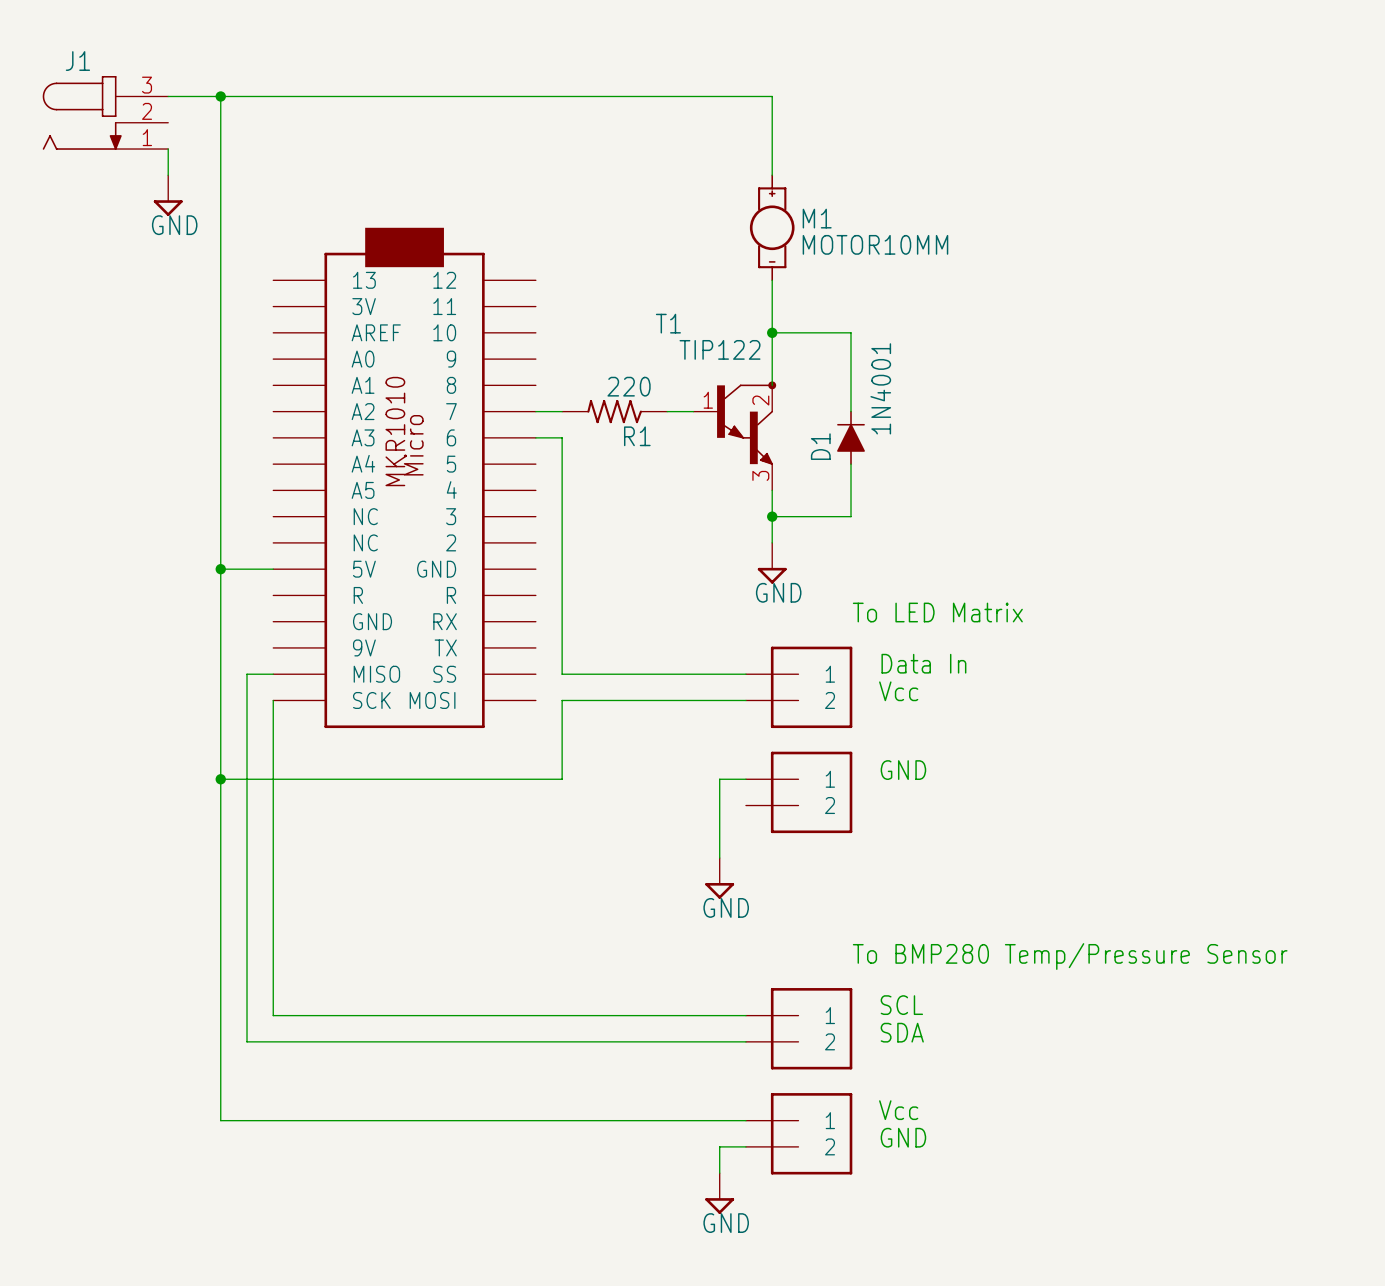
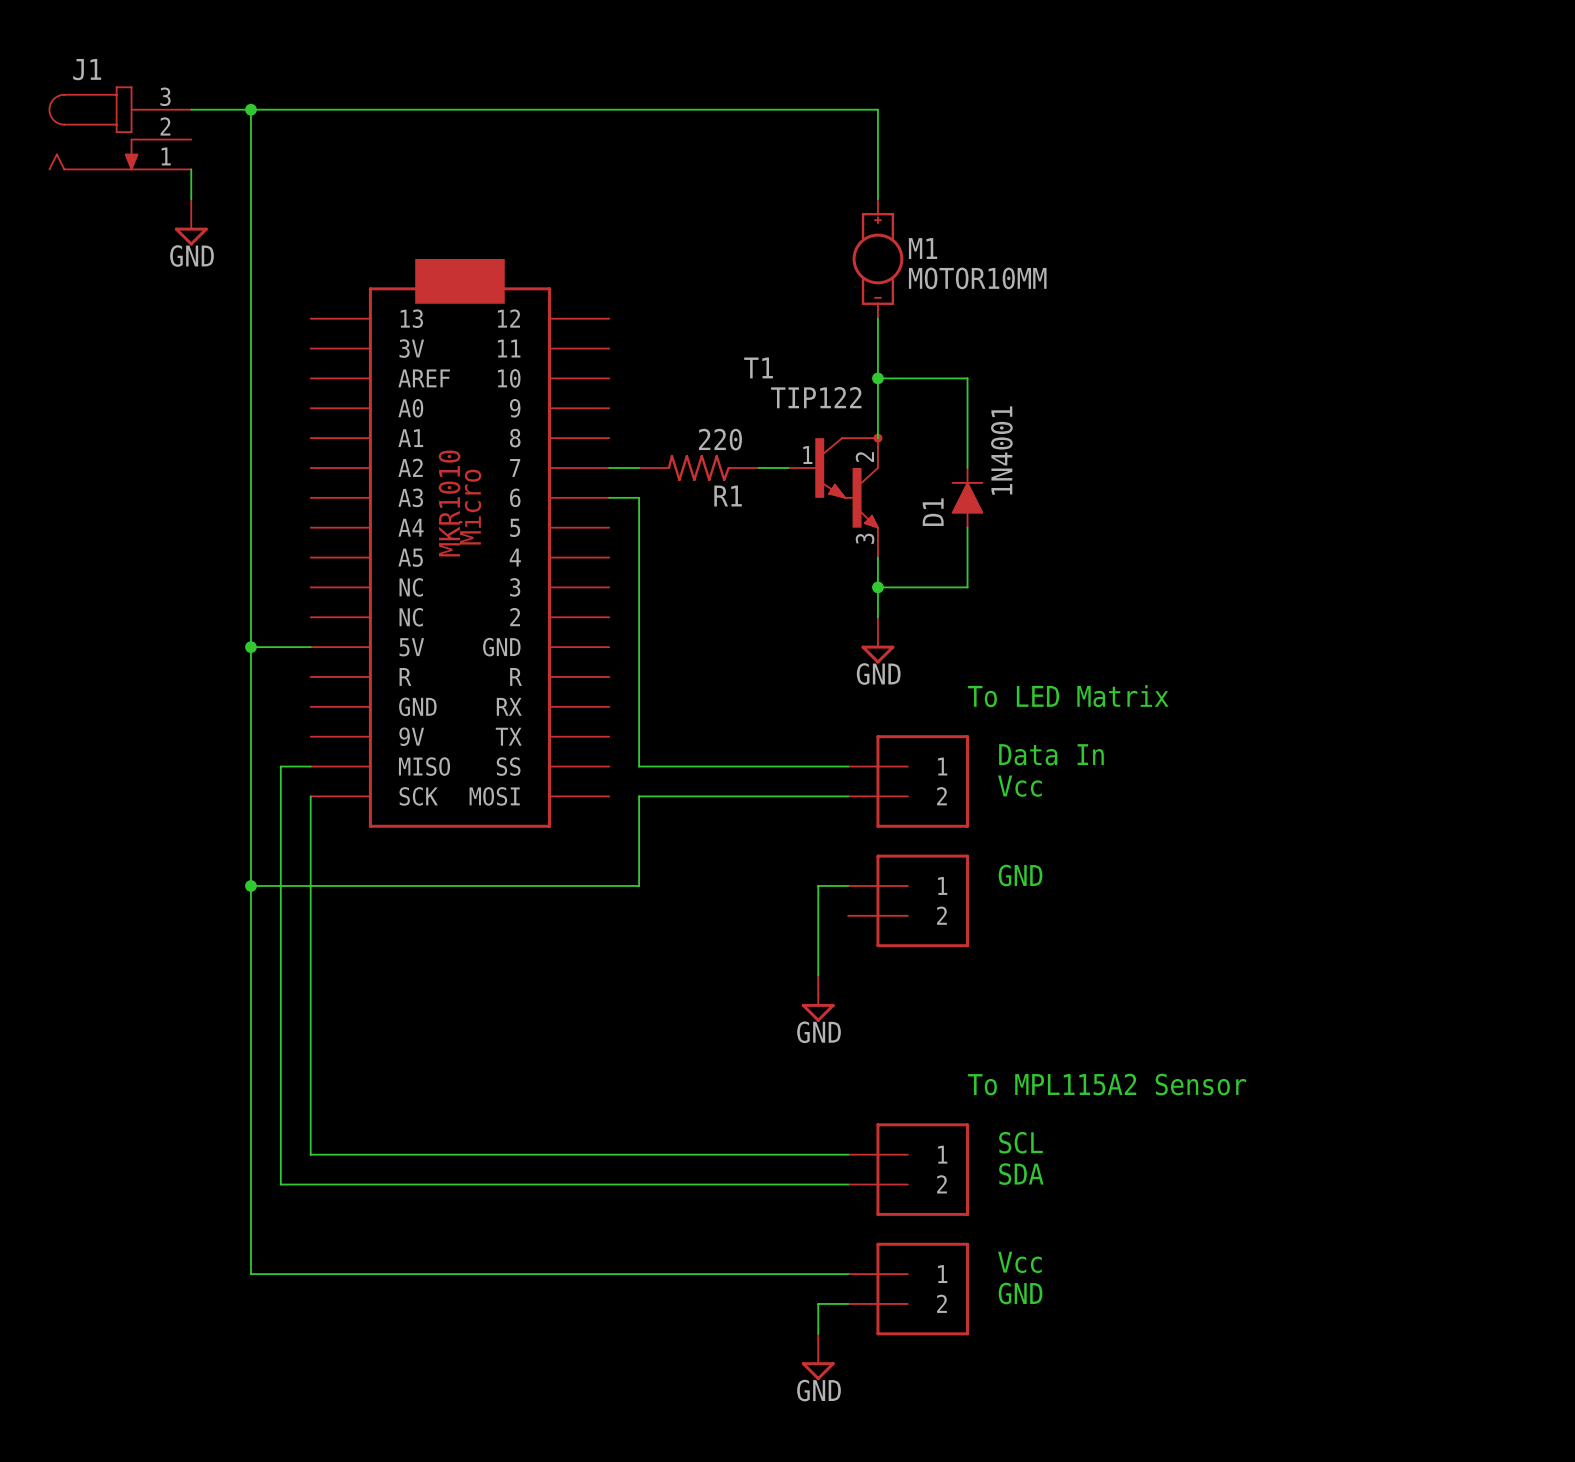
text: To BMP280 Temp/Pressure Sensor (1070, 956) -> To MPL115A2 Sensor (1107, 1084)

